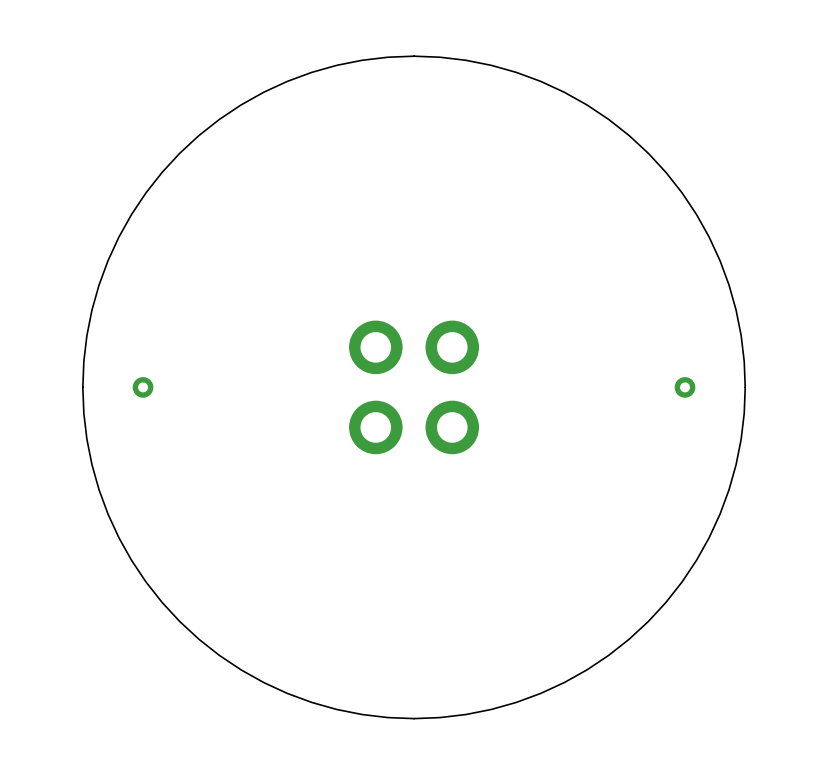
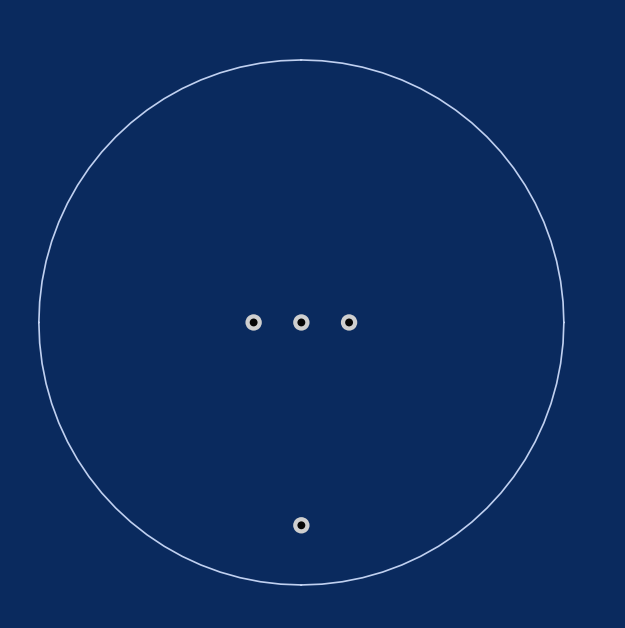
part: (375, 347) -> none
part: (452, 347) -> none
part: (143, 387) -> none
part: none -> (253, 322)
part: none -> (301, 322)
part: none -> (349, 322)
part: (685, 387) -> none
part: (375, 427) -> none
part: (452, 427) -> none
part: none -> (301, 525)

